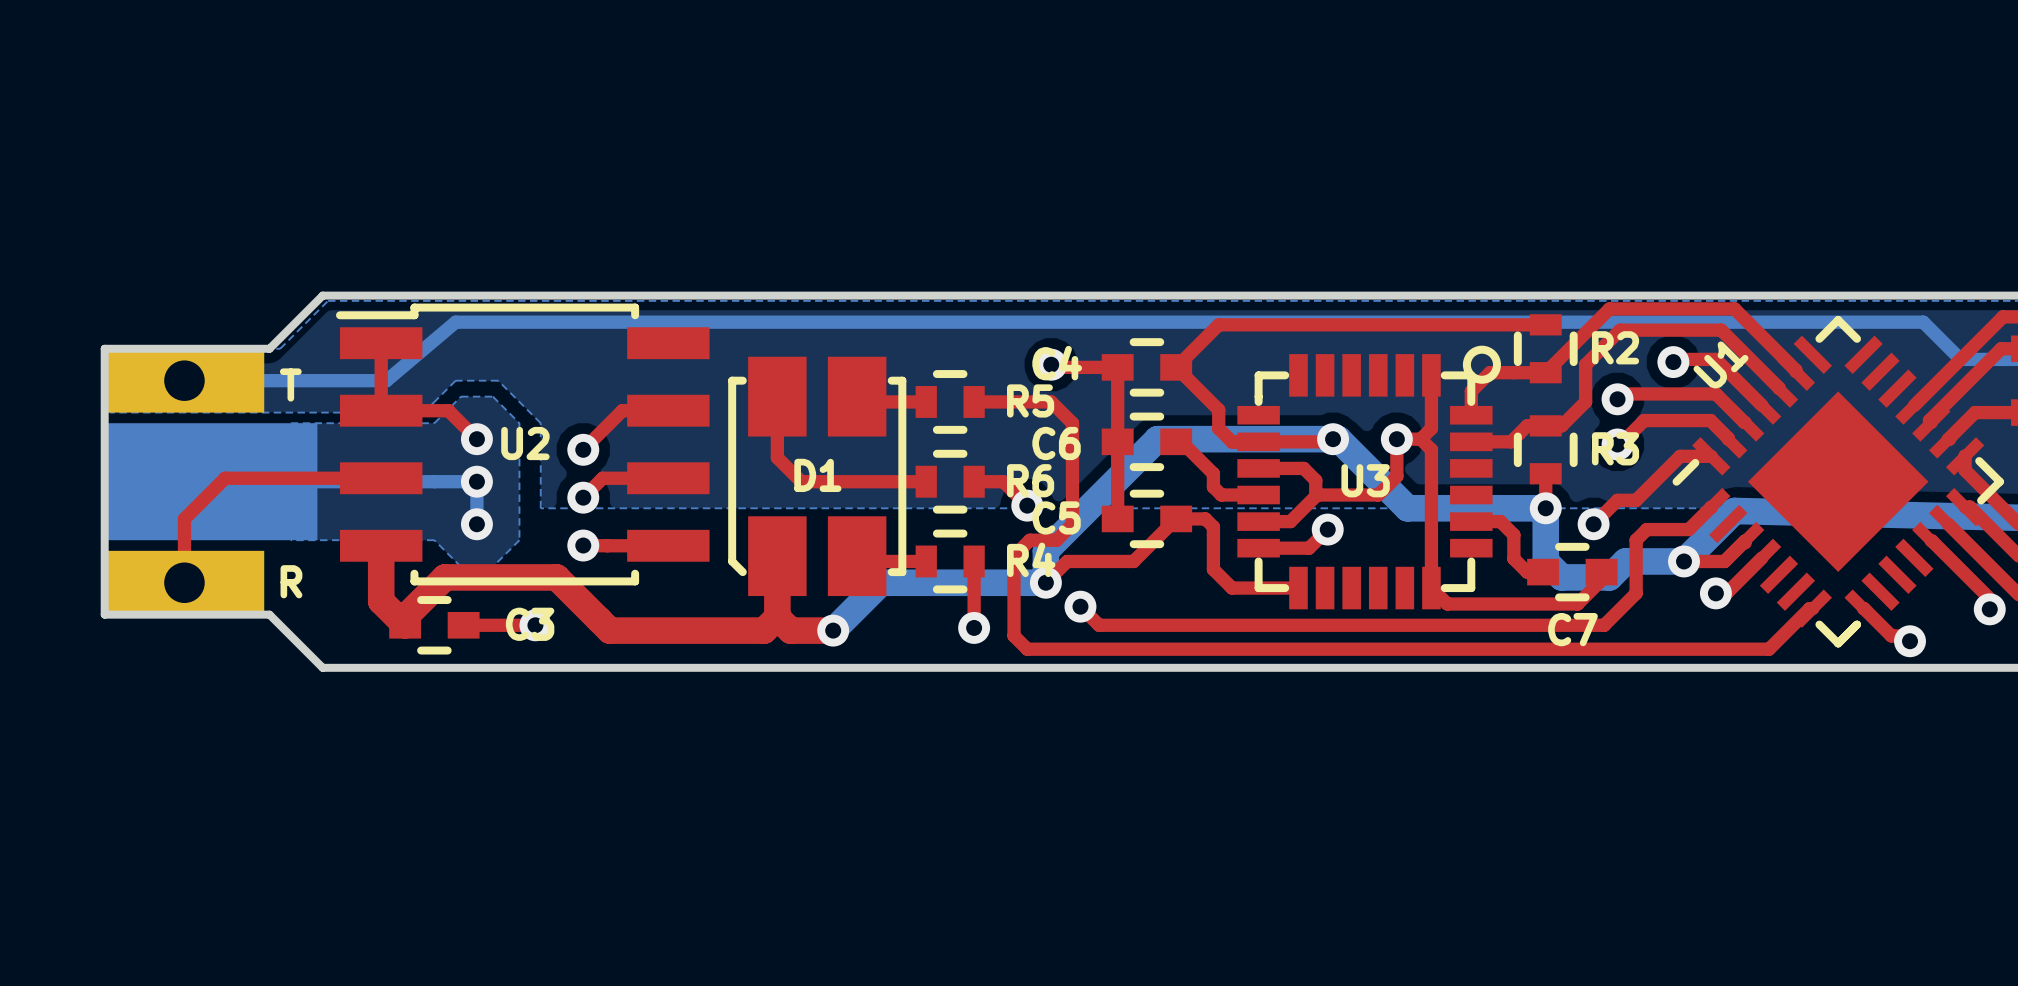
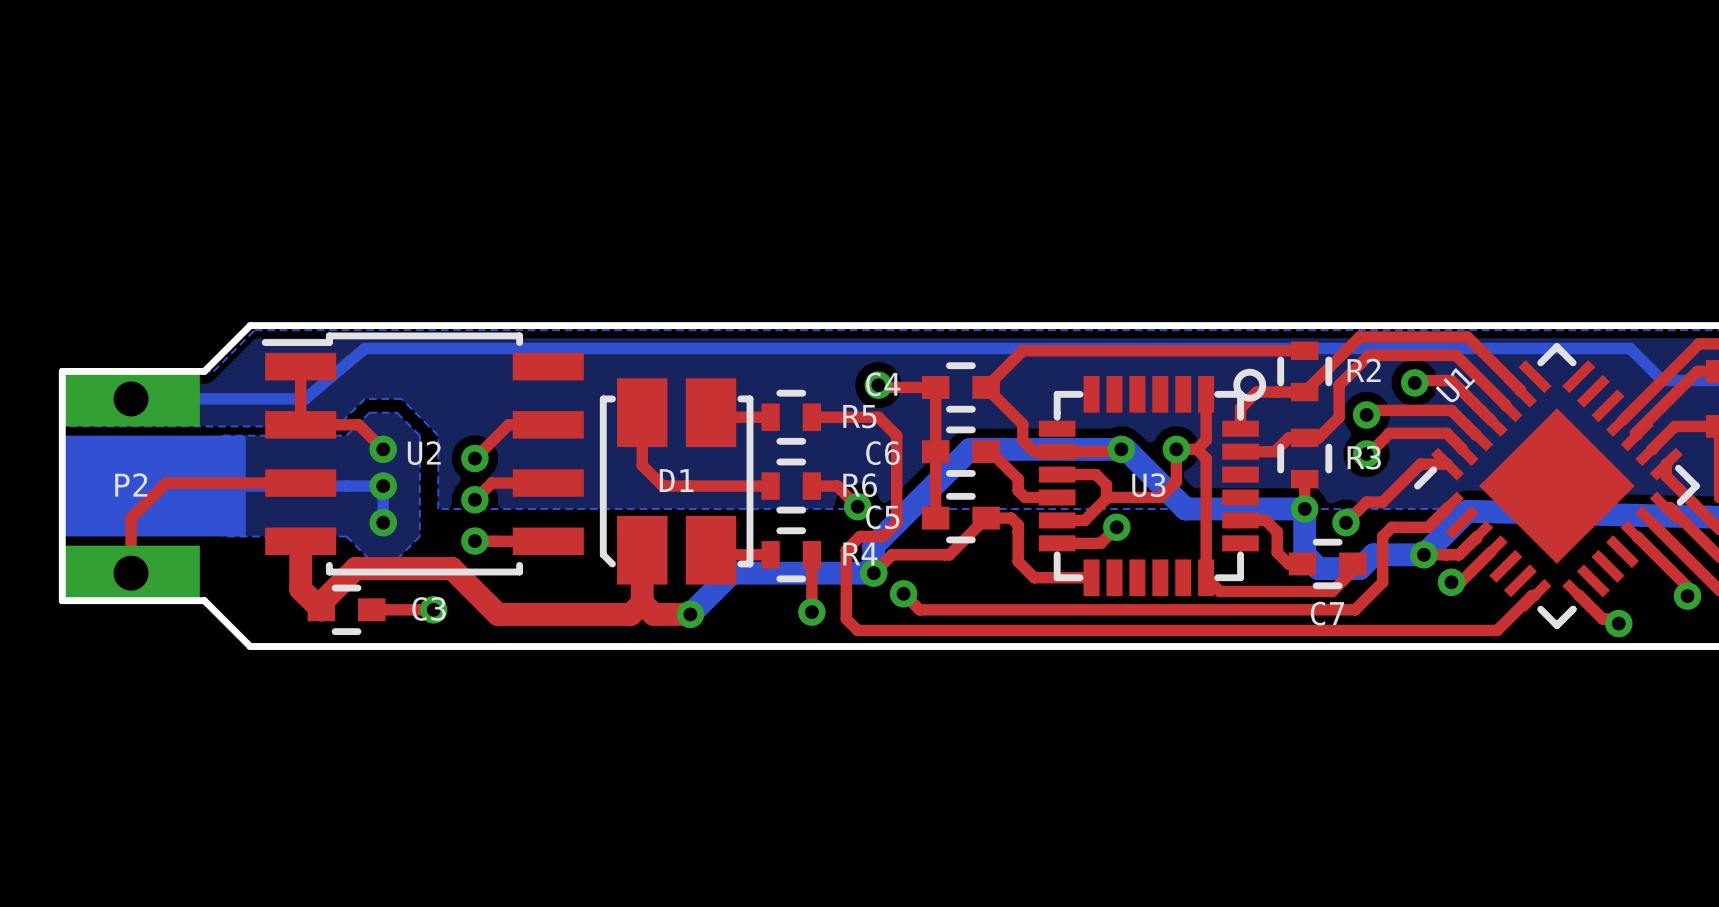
text: T (290, 385) -> none
P2 name: none -> P2 (131, 484)
text: R (291, 581) -> none

